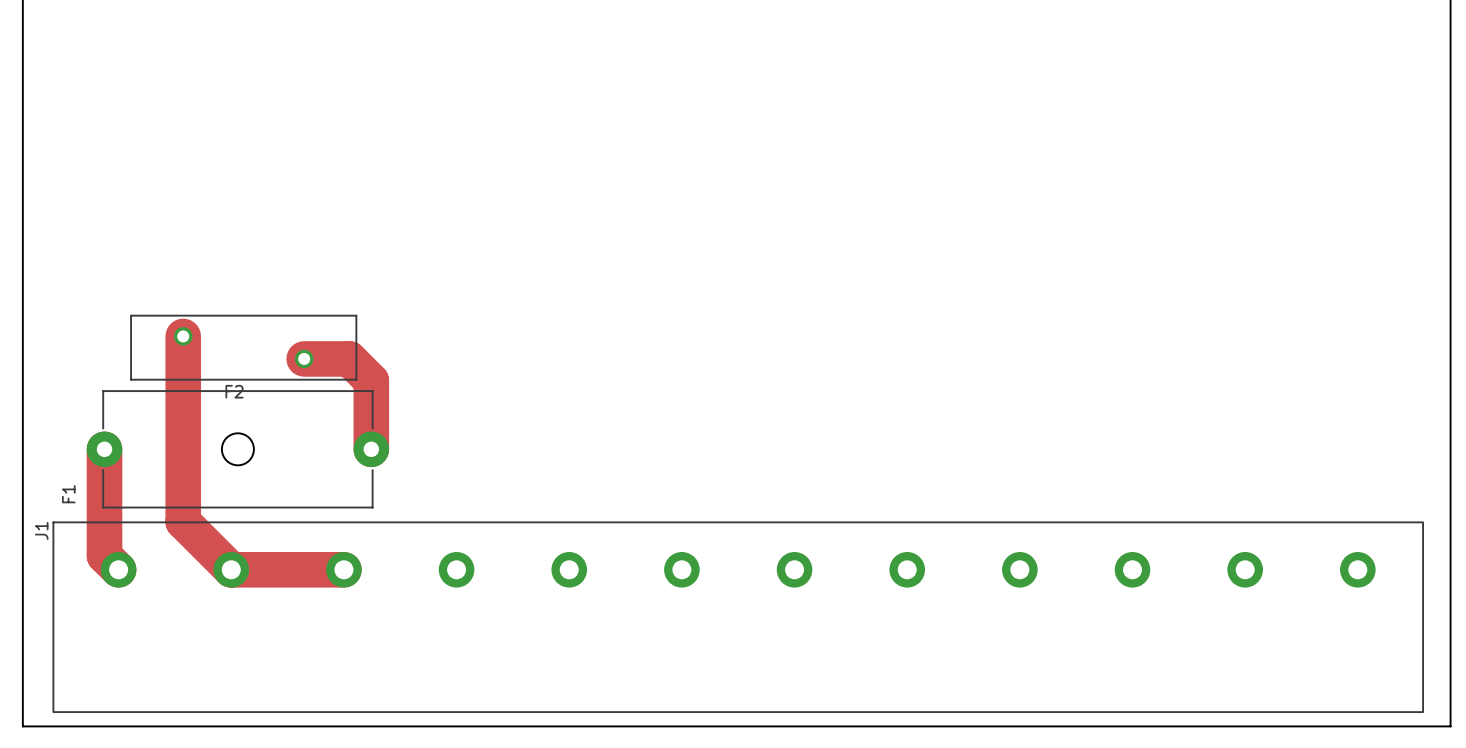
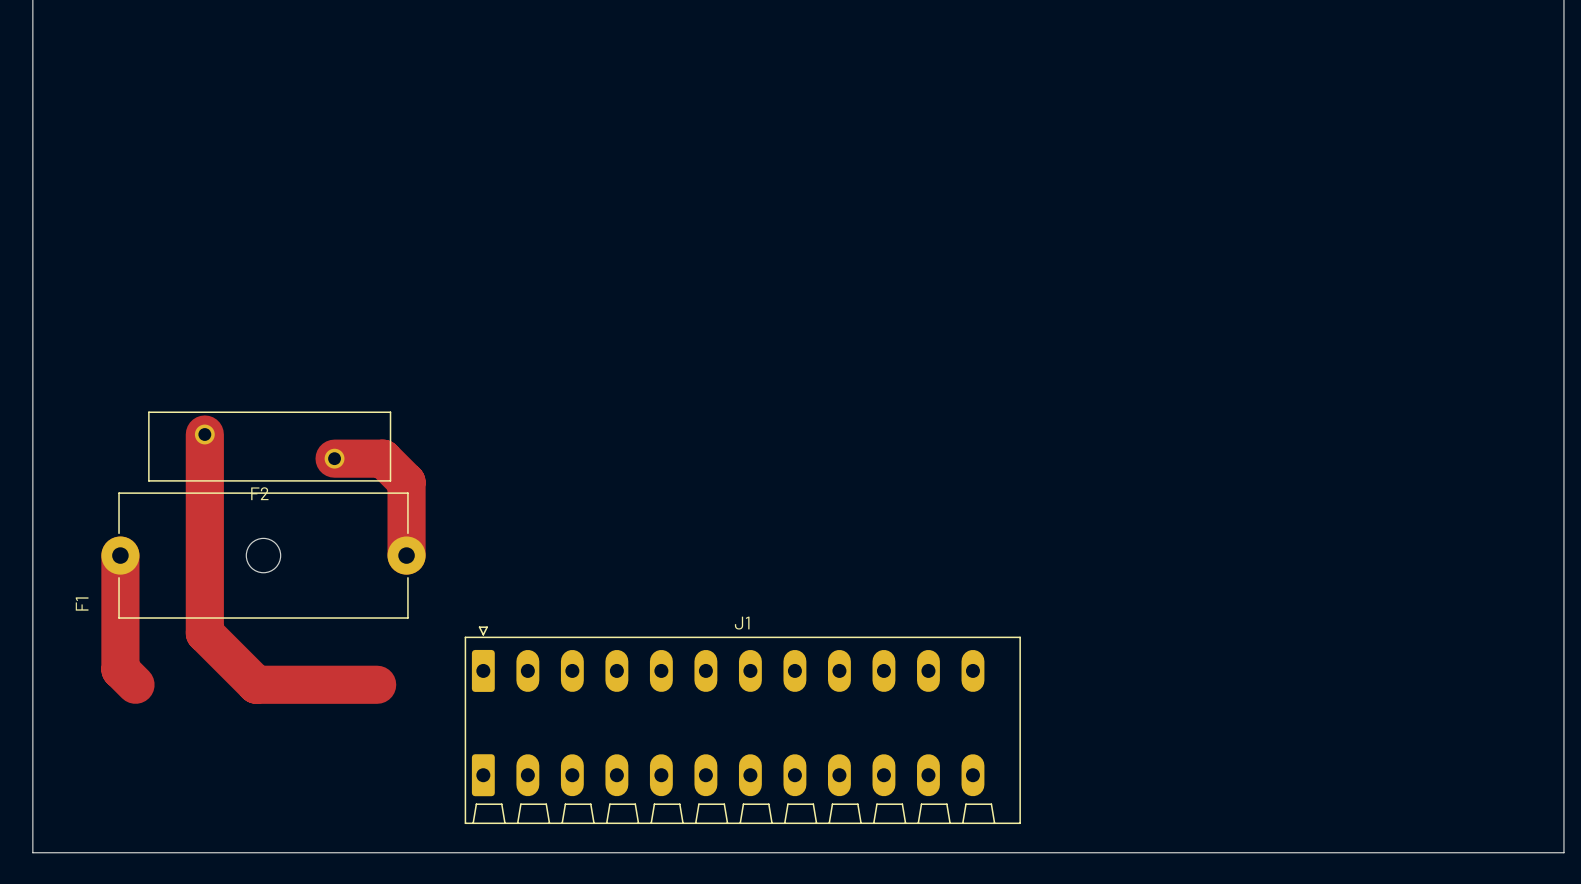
J1 footprint: [52, 521, 1424, 713] -> [464, 626, 1021, 825]
J1 name position: J1 (41, 530) -> J1 (742, 623)

